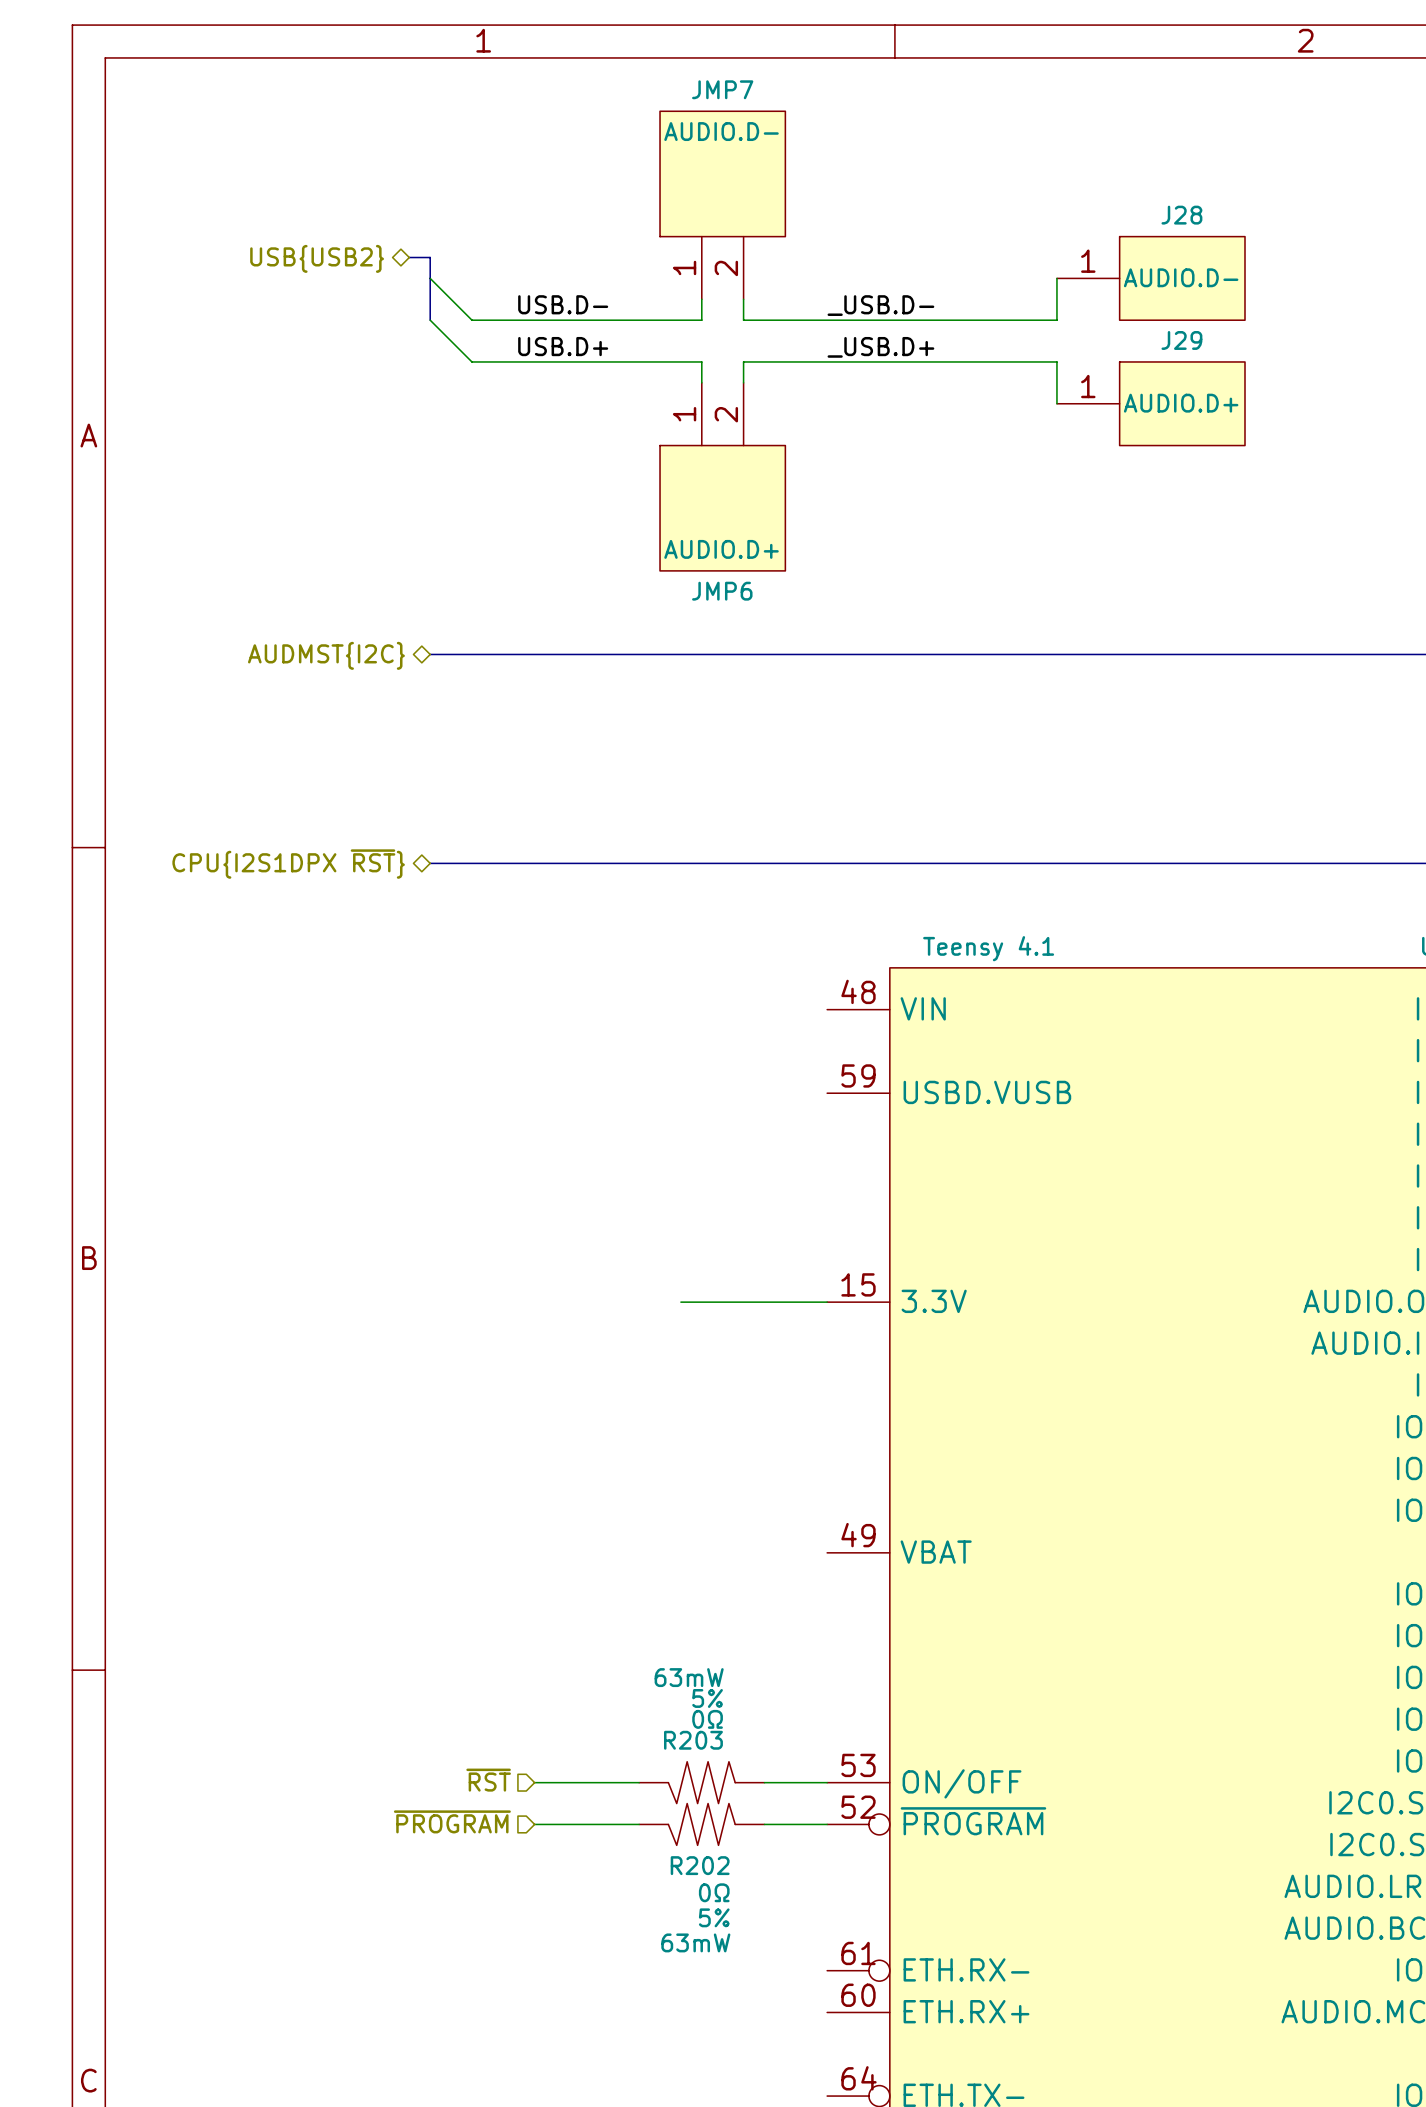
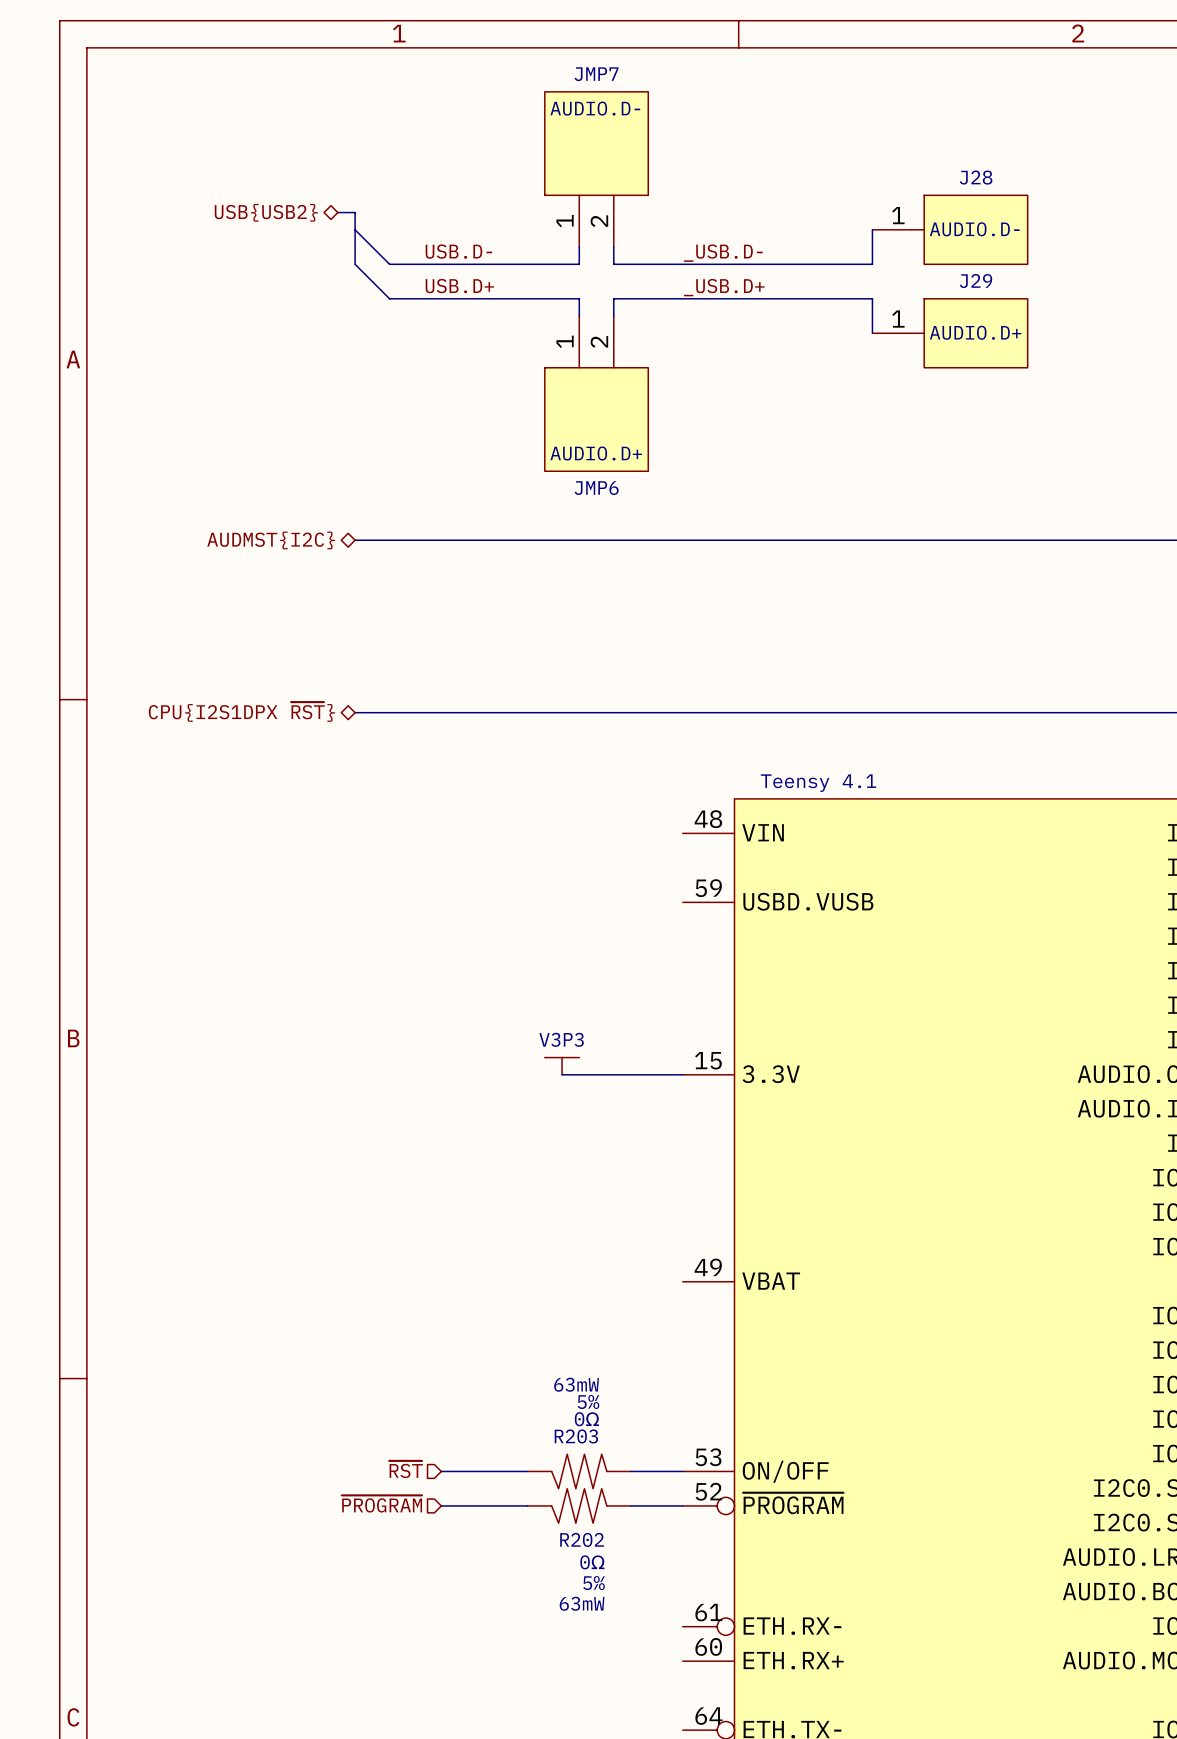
power symbol: none -> V3P3 (562, 1066)

